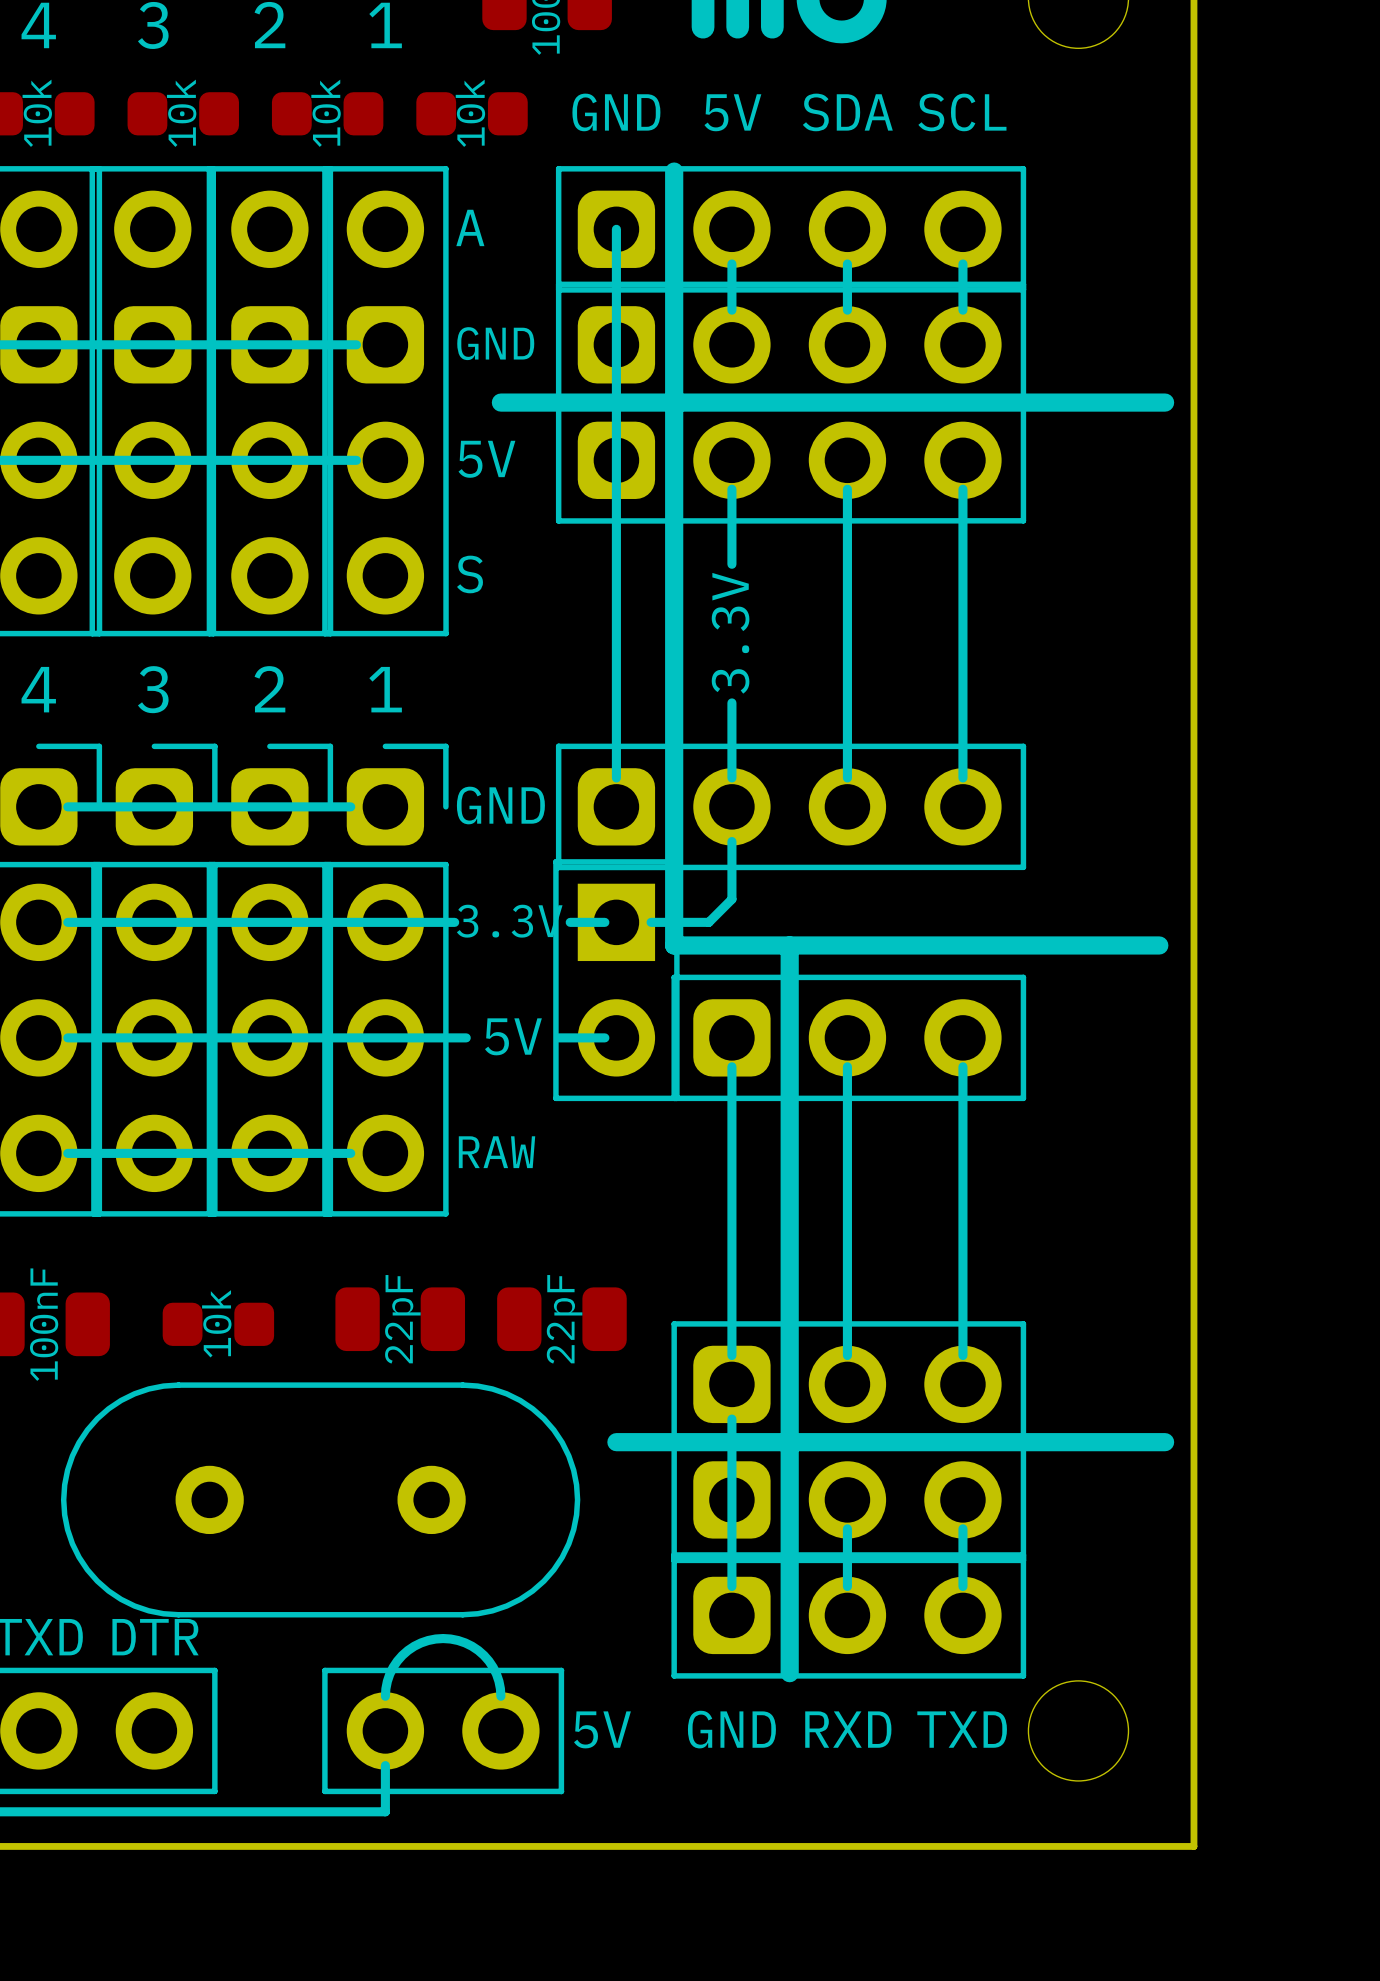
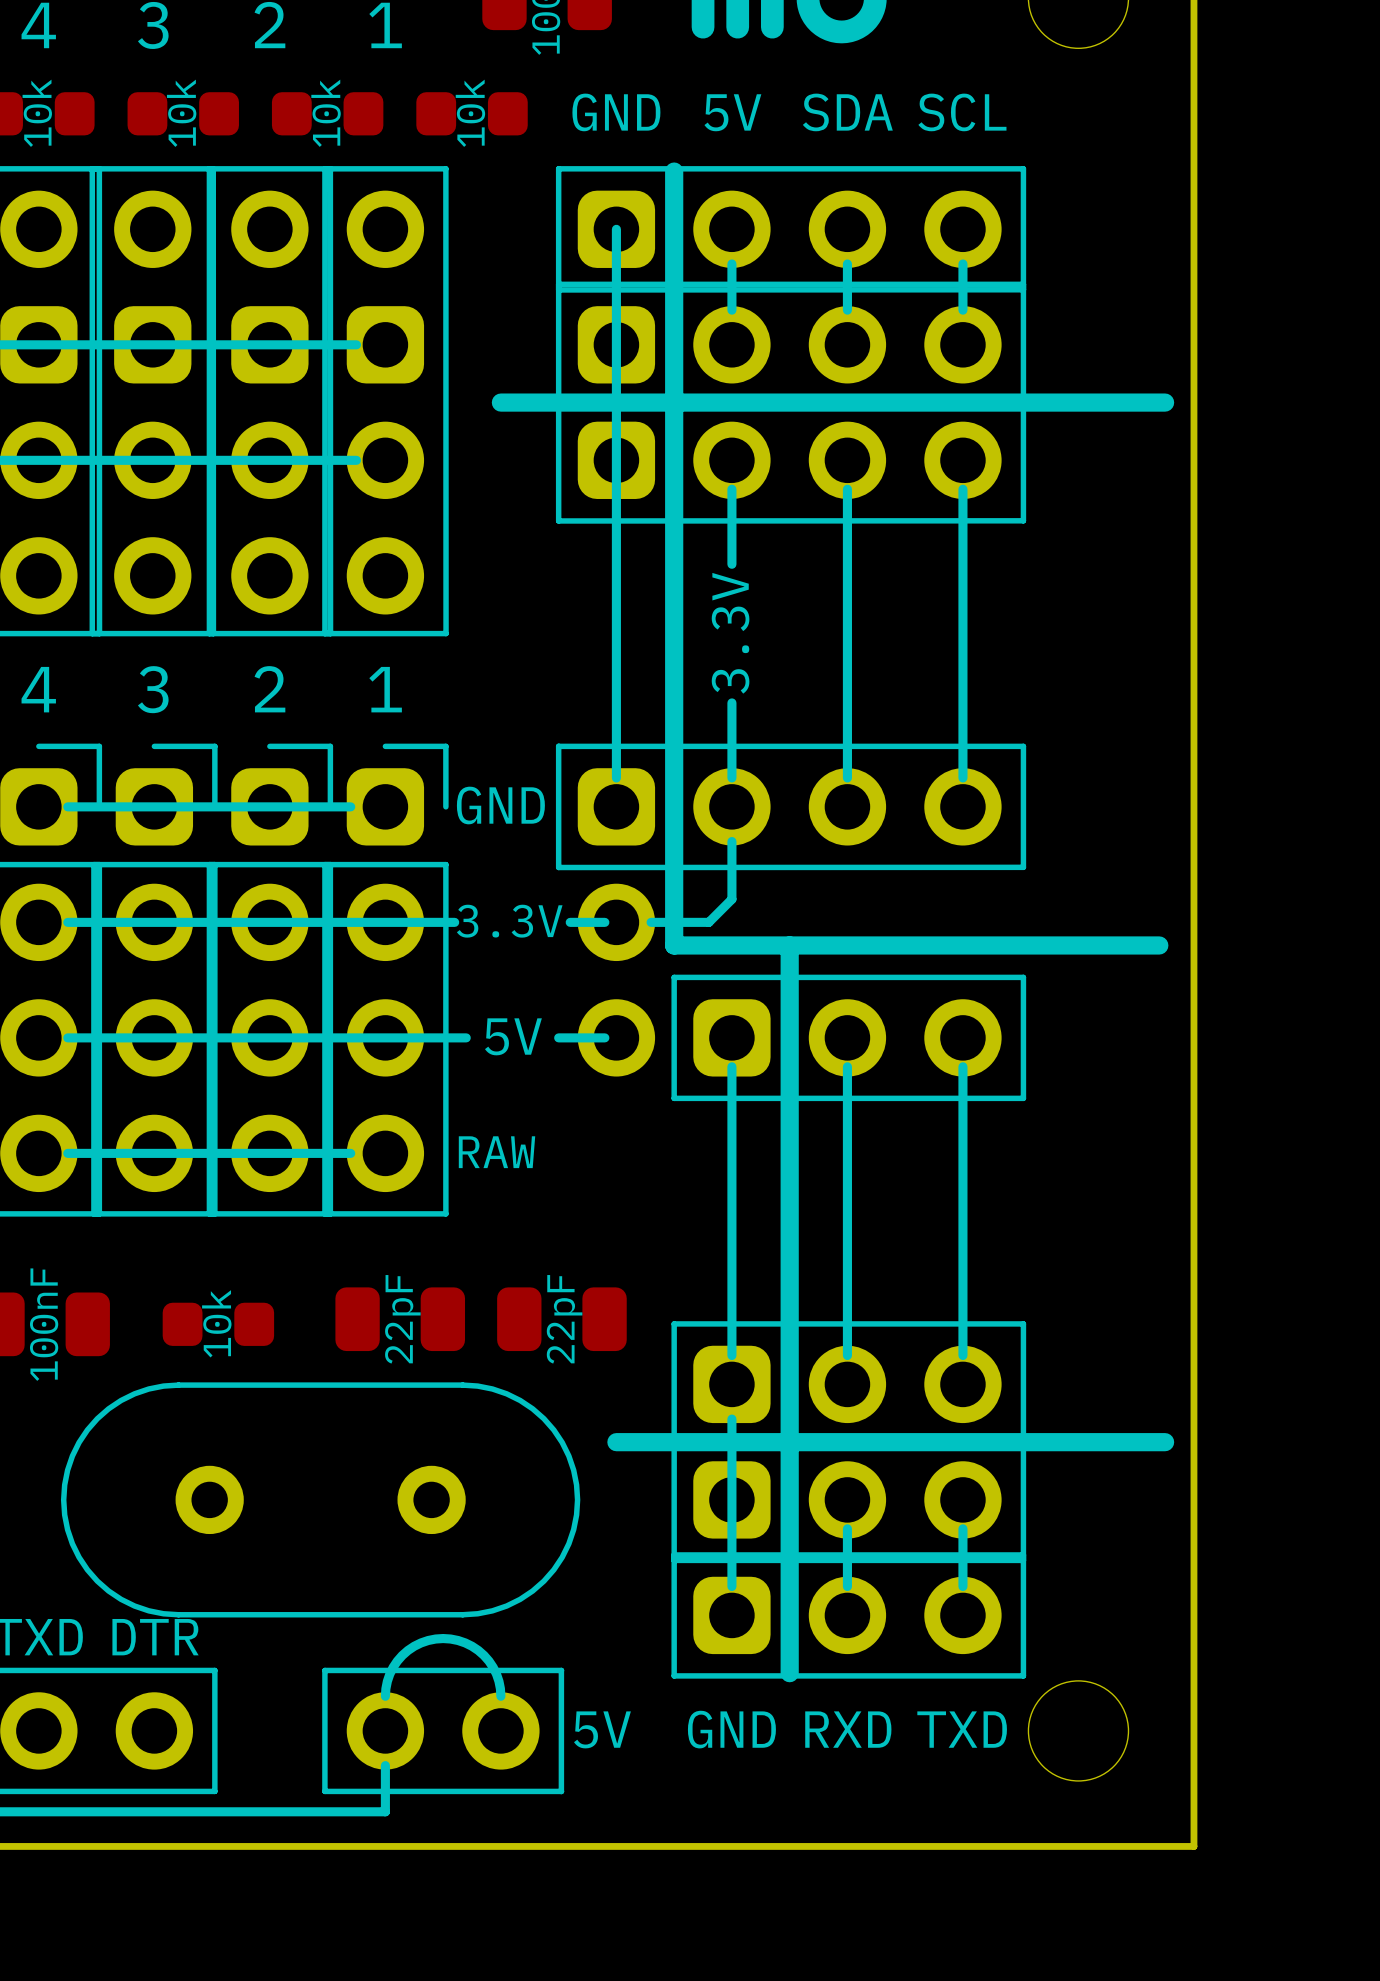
text: A (470, 227) -> none
text: GND (495, 343) -> none
text: 5V (486, 459) -> none
text: S (470, 574) -> none
part footprint: [553, 859, 680, 1102] -> [577, 883, 656, 1077]

